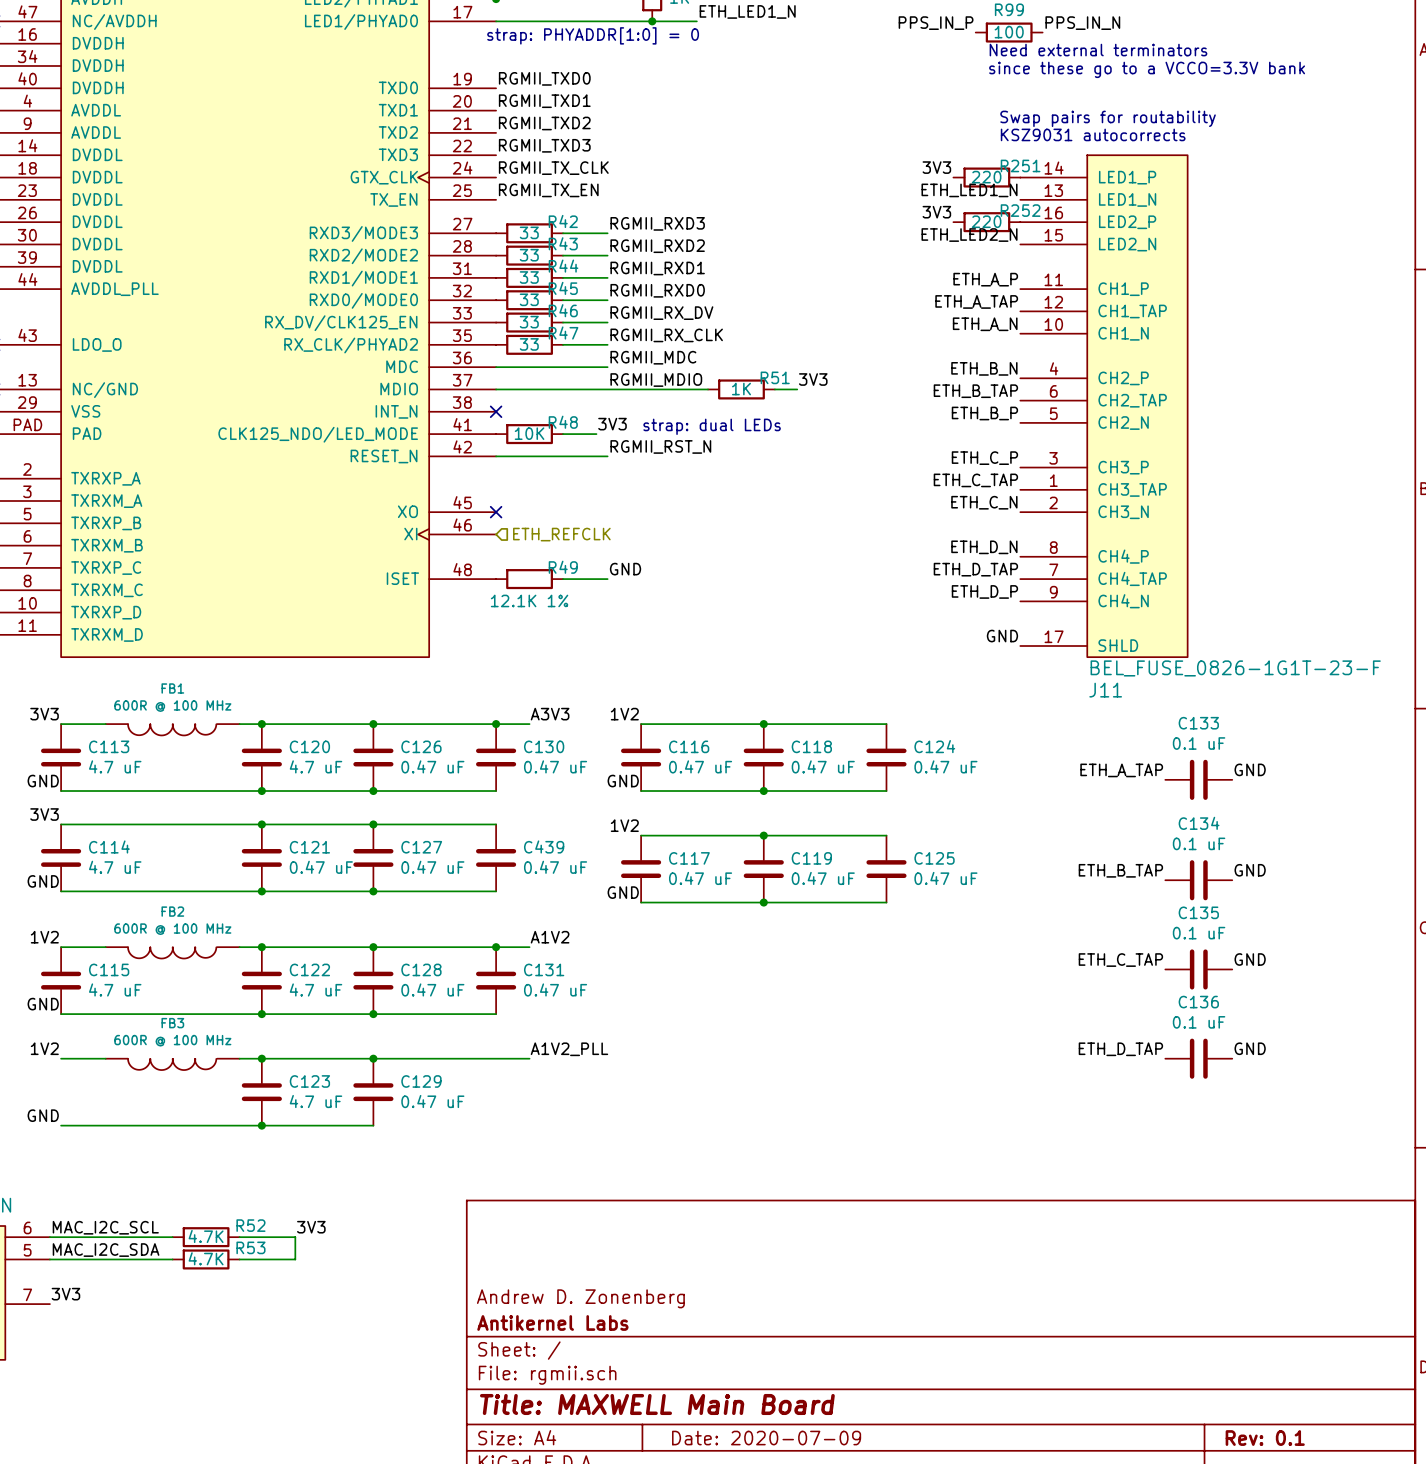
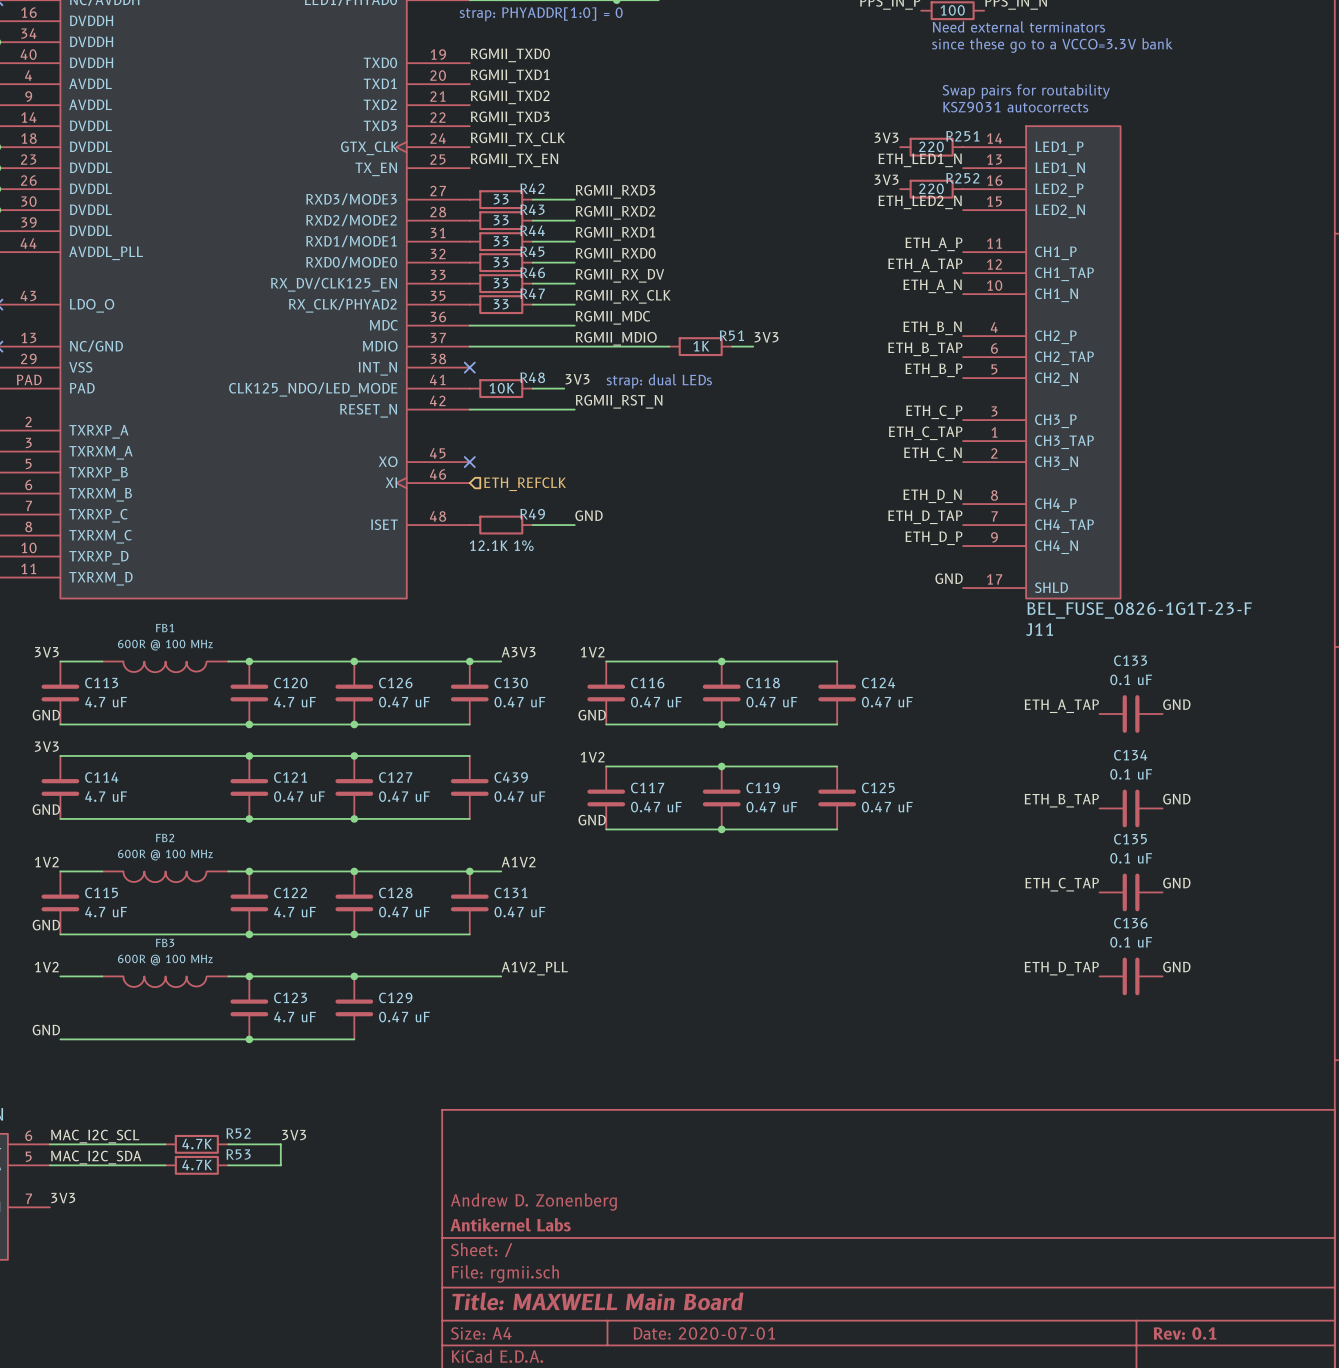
title block: Date: 2020-07-09 (766, 1438) -> Date: 2020-07-01 (704, 1333)

